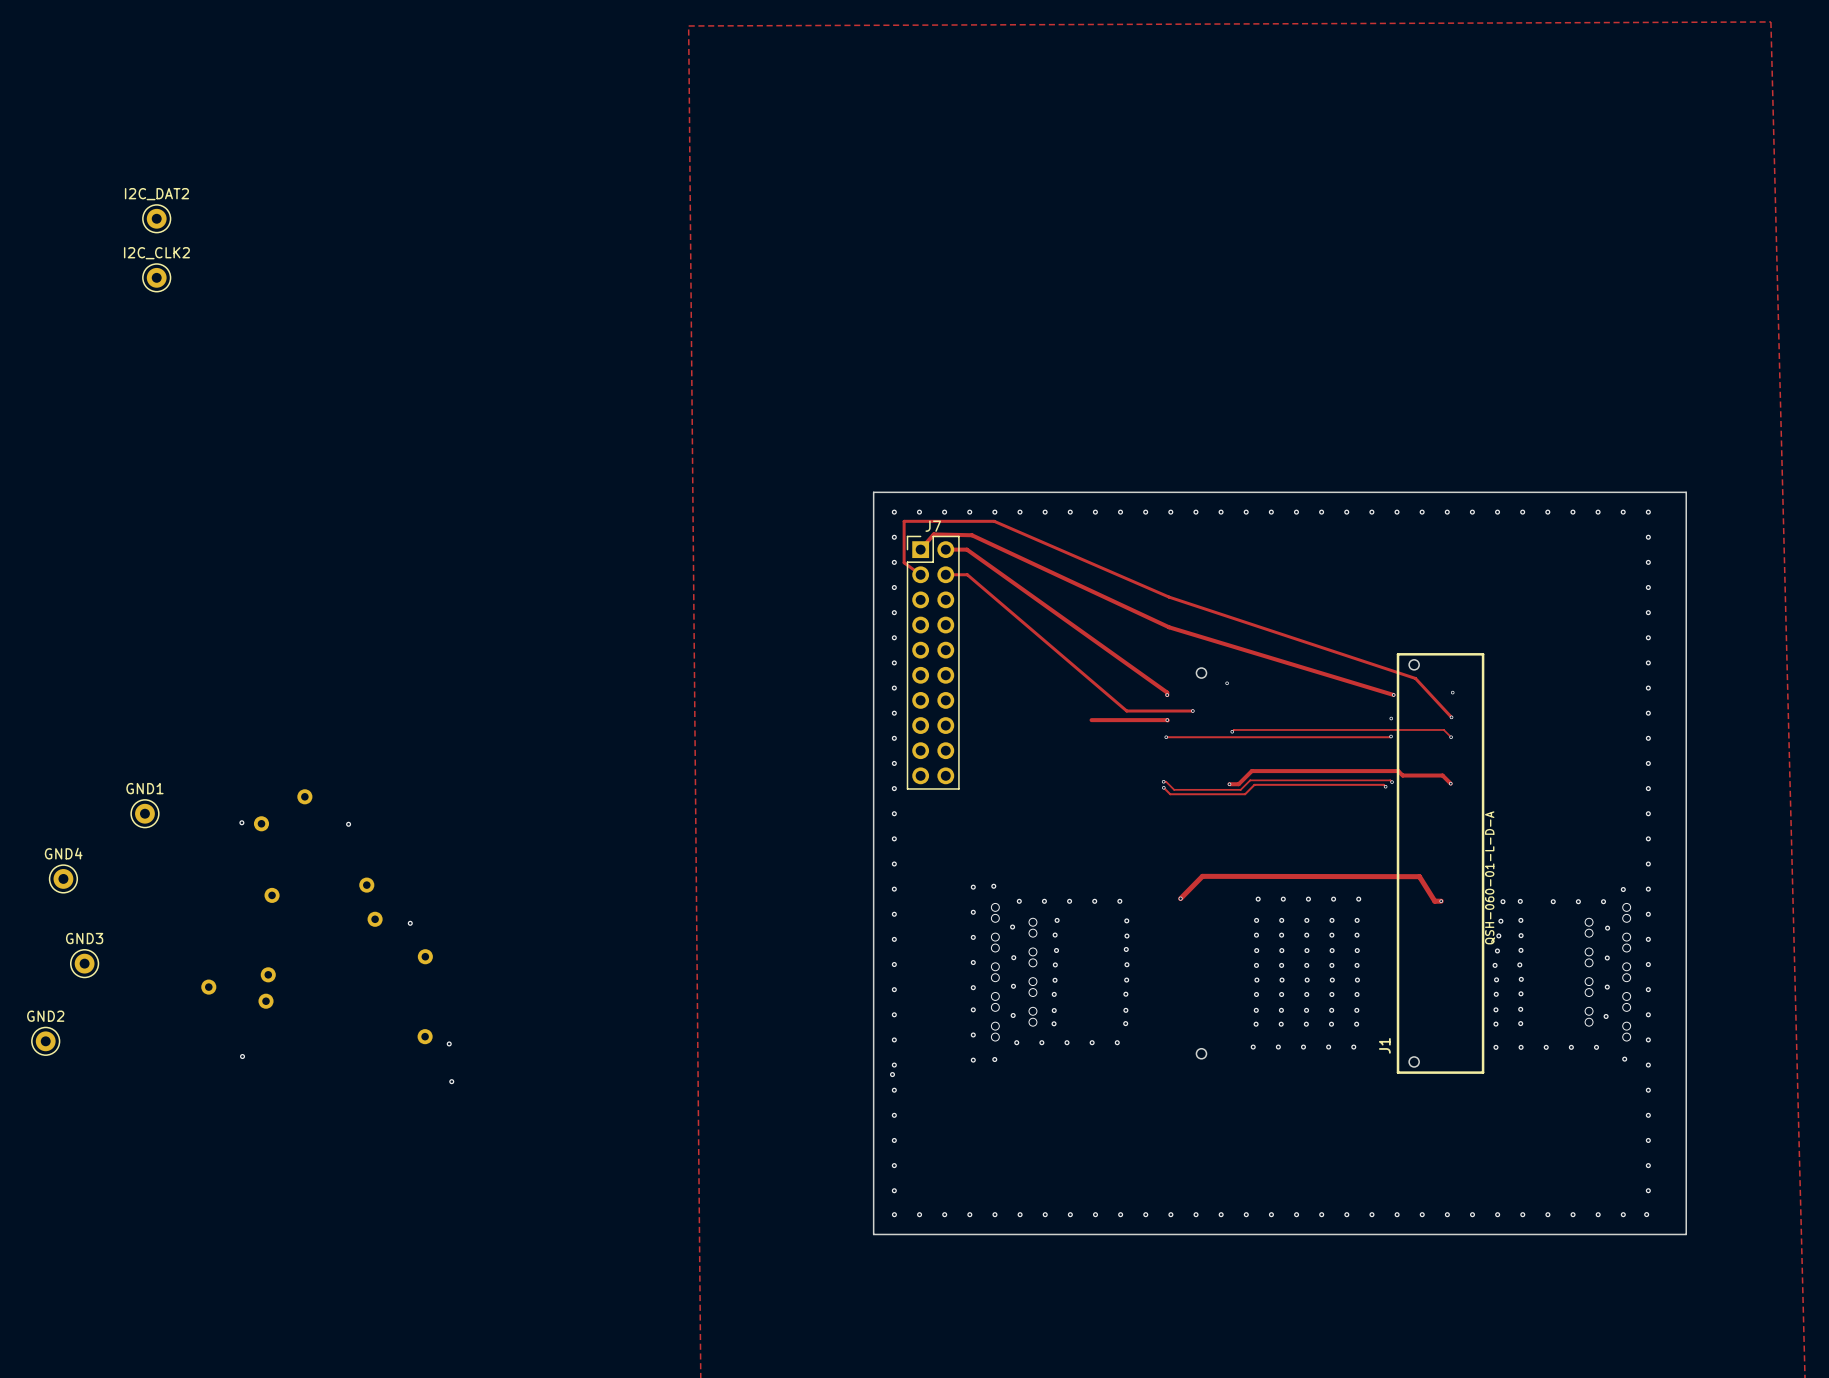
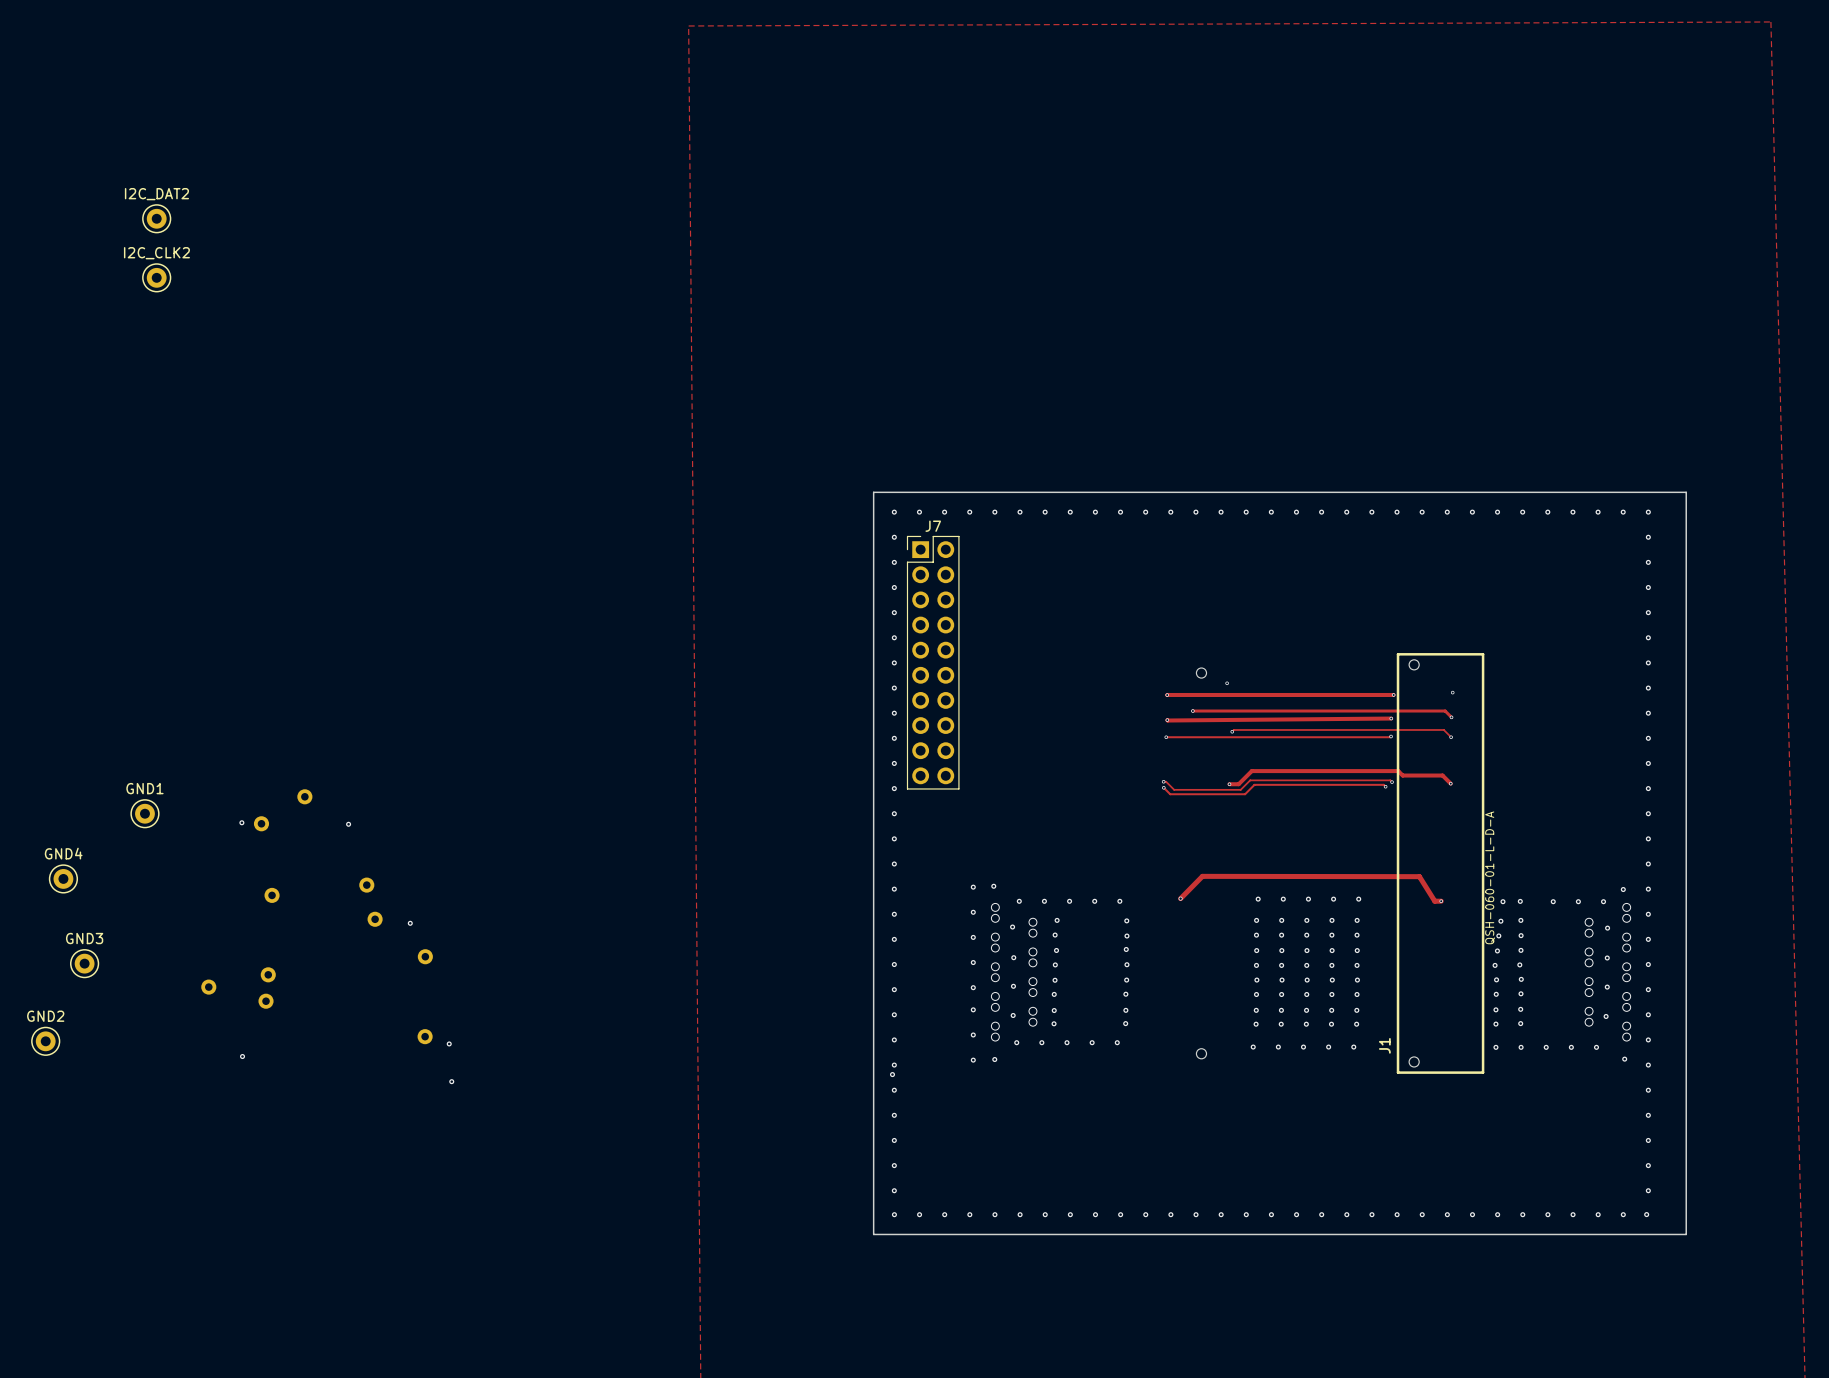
track: (920, 549) (933, 534) (972, 535) (1169, 627) (1393, 694) -> (1167, 694) (1393, 694)
track: (945, 549) (966, 549) (1167, 692) (1167, 695) -> none
track: (920, 574) (904, 562) (904, 521) (994, 521) (1169, 597) (1415, 678) (1451, 717) -> (1192, 711) (1445, 711) (1451, 717)
track: (945, 574) (967, 574) (1126, 711) (1192, 711) -> none
track: none -> (1391, 718) (1167, 720)
track: (1091, 720) (1167, 720) -> none

